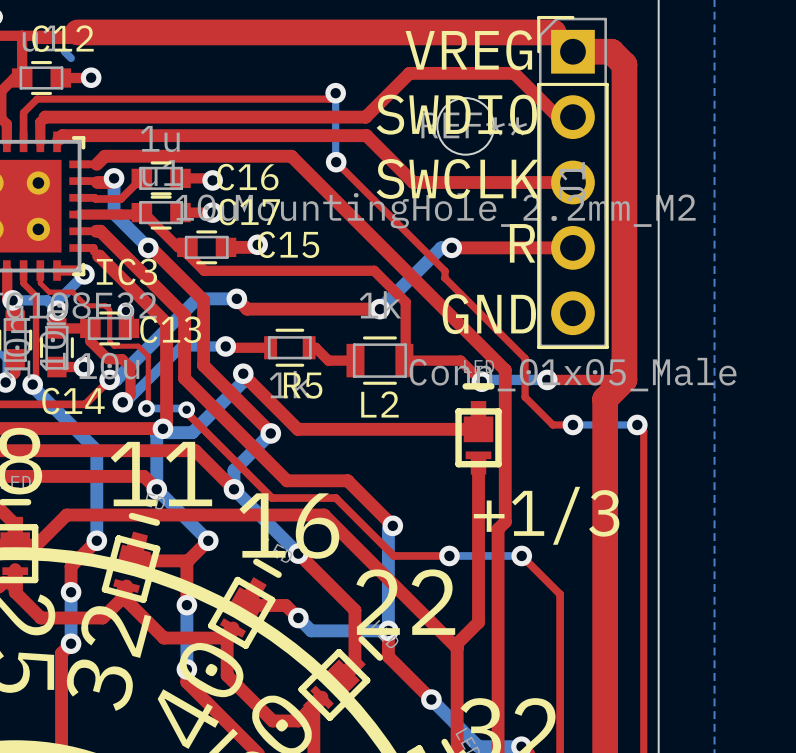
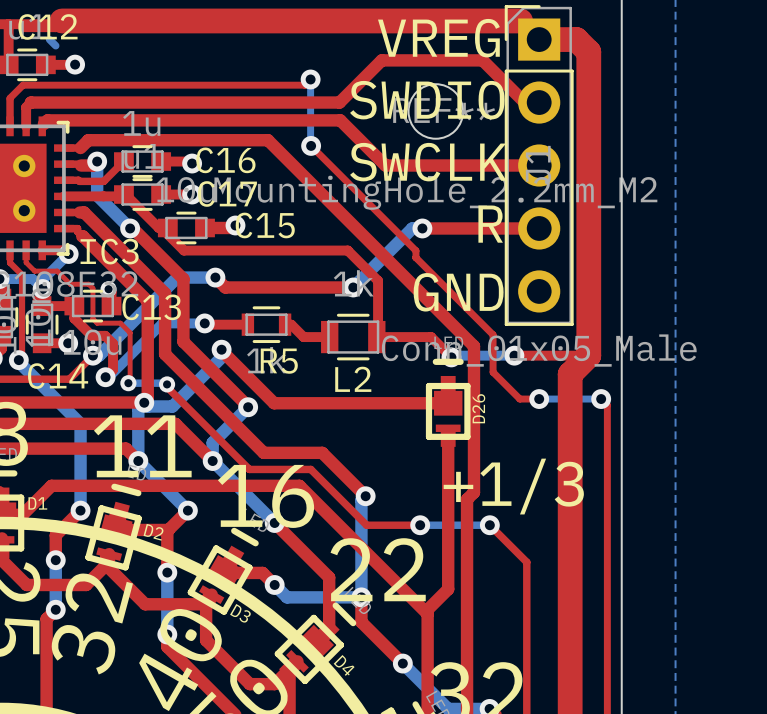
D26 name: none -> D26 (478, 408)
D1 name: none -> D1 (37, 503)
D2 name: none -> D2 (153, 532)
D3 name: none -> D3 (240, 613)
D4 name: none -> D4 (344, 665)

